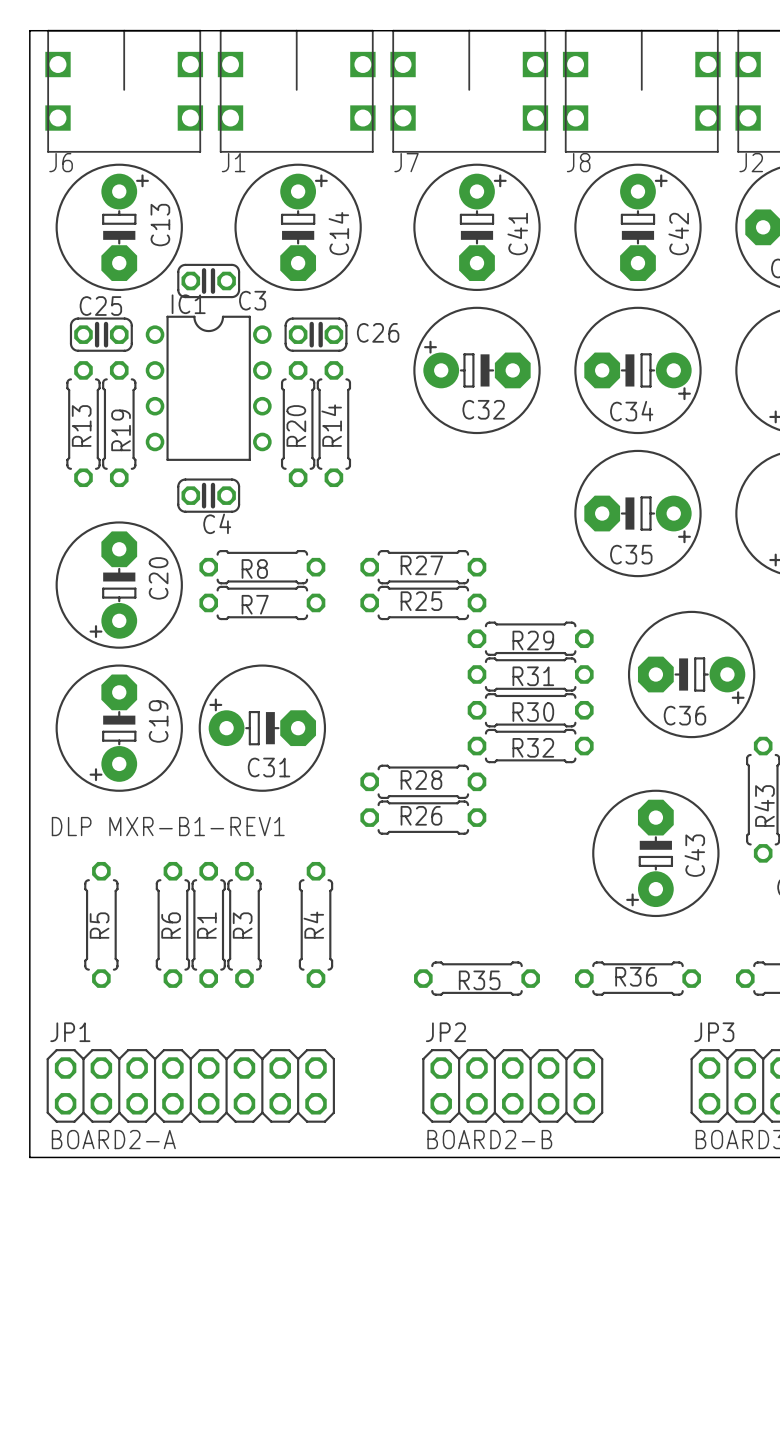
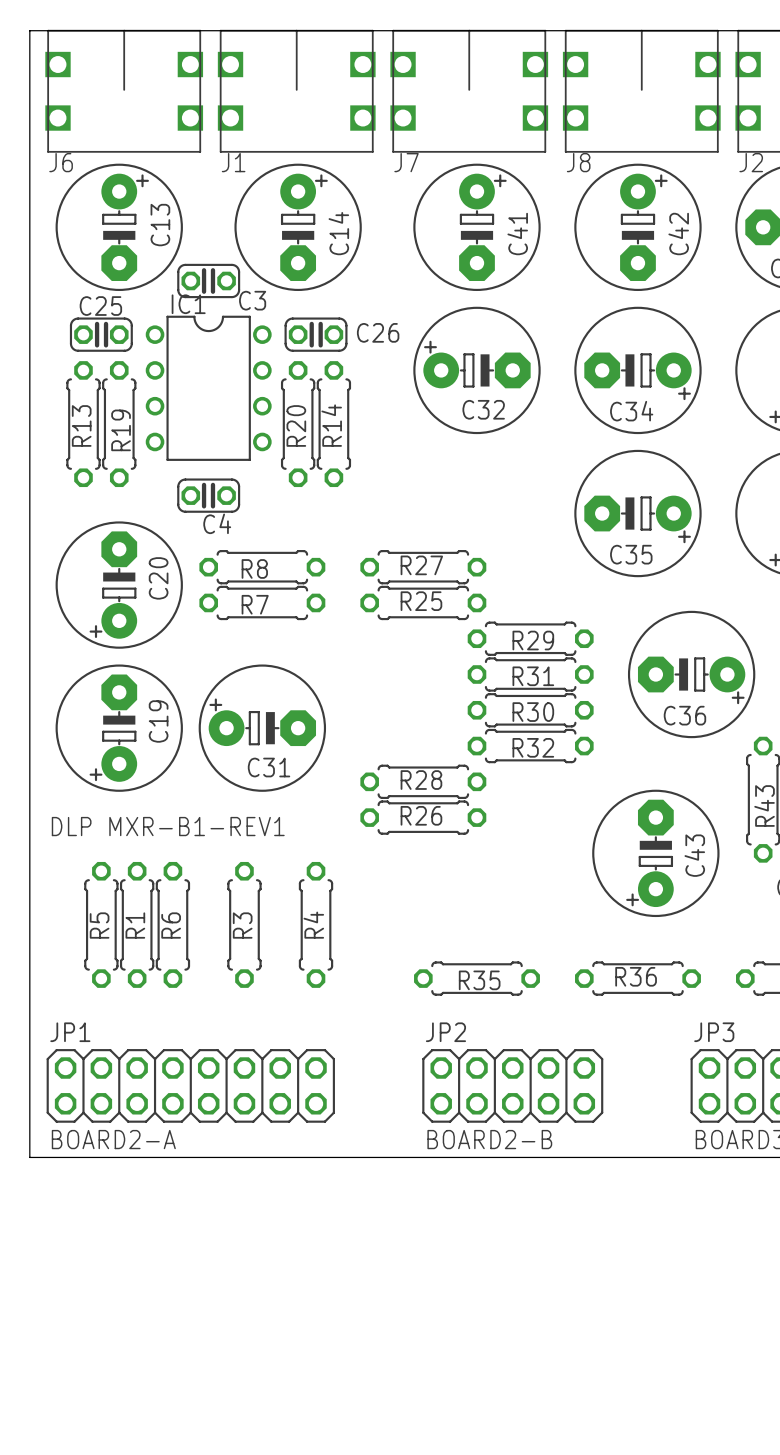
R1 position: (208, 924) -> (137, 924)

